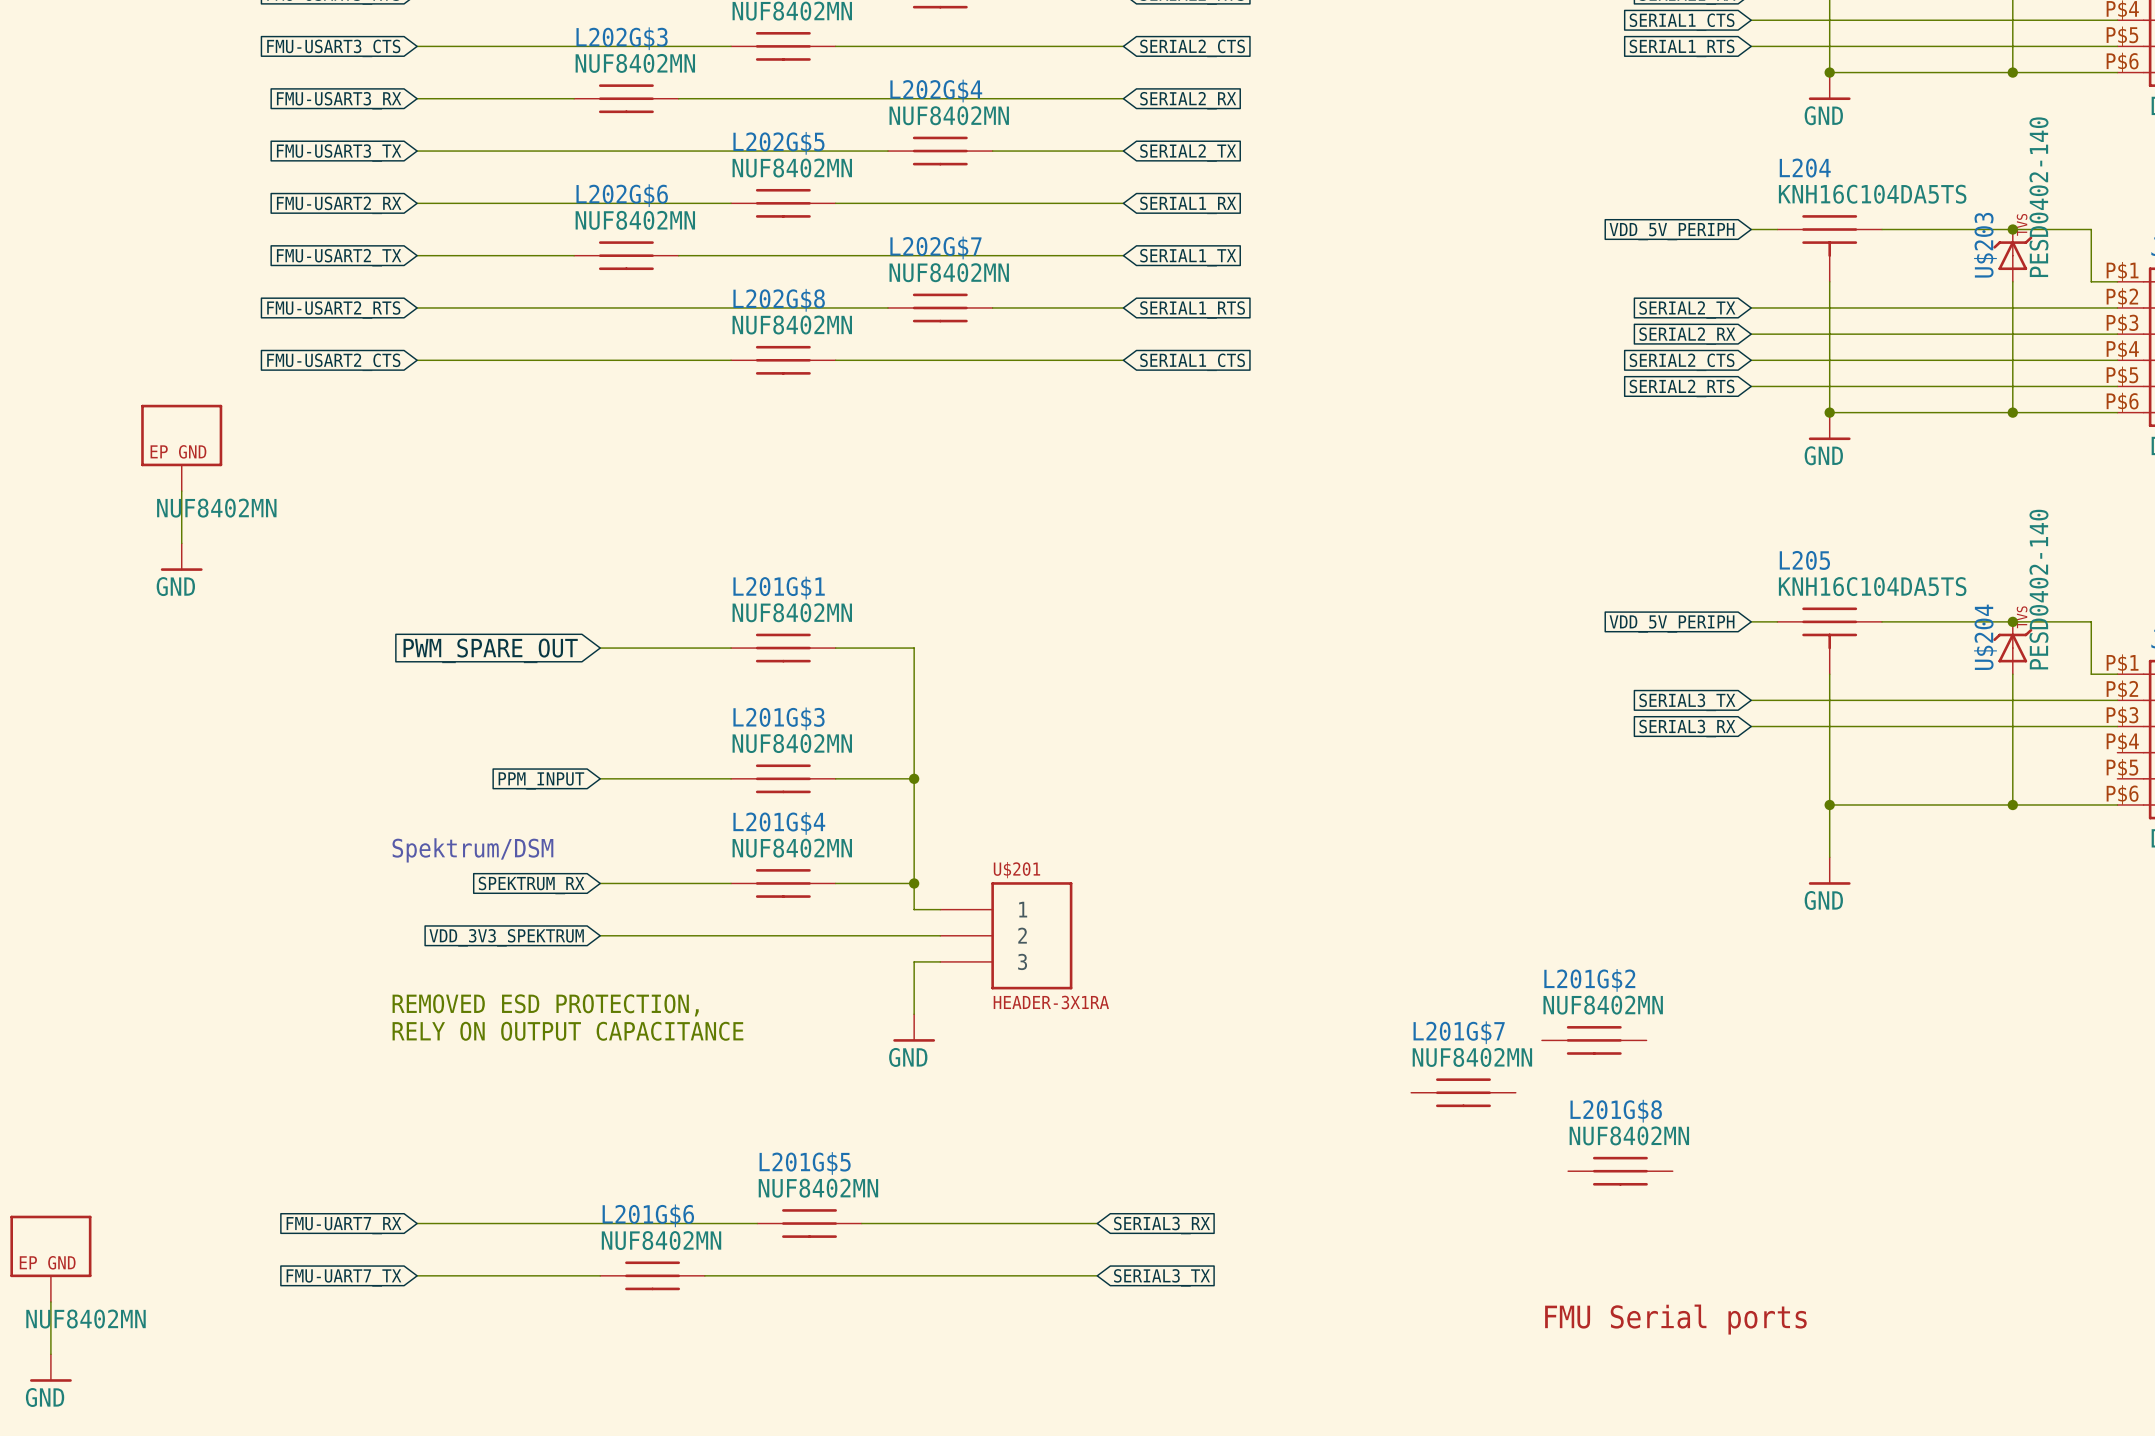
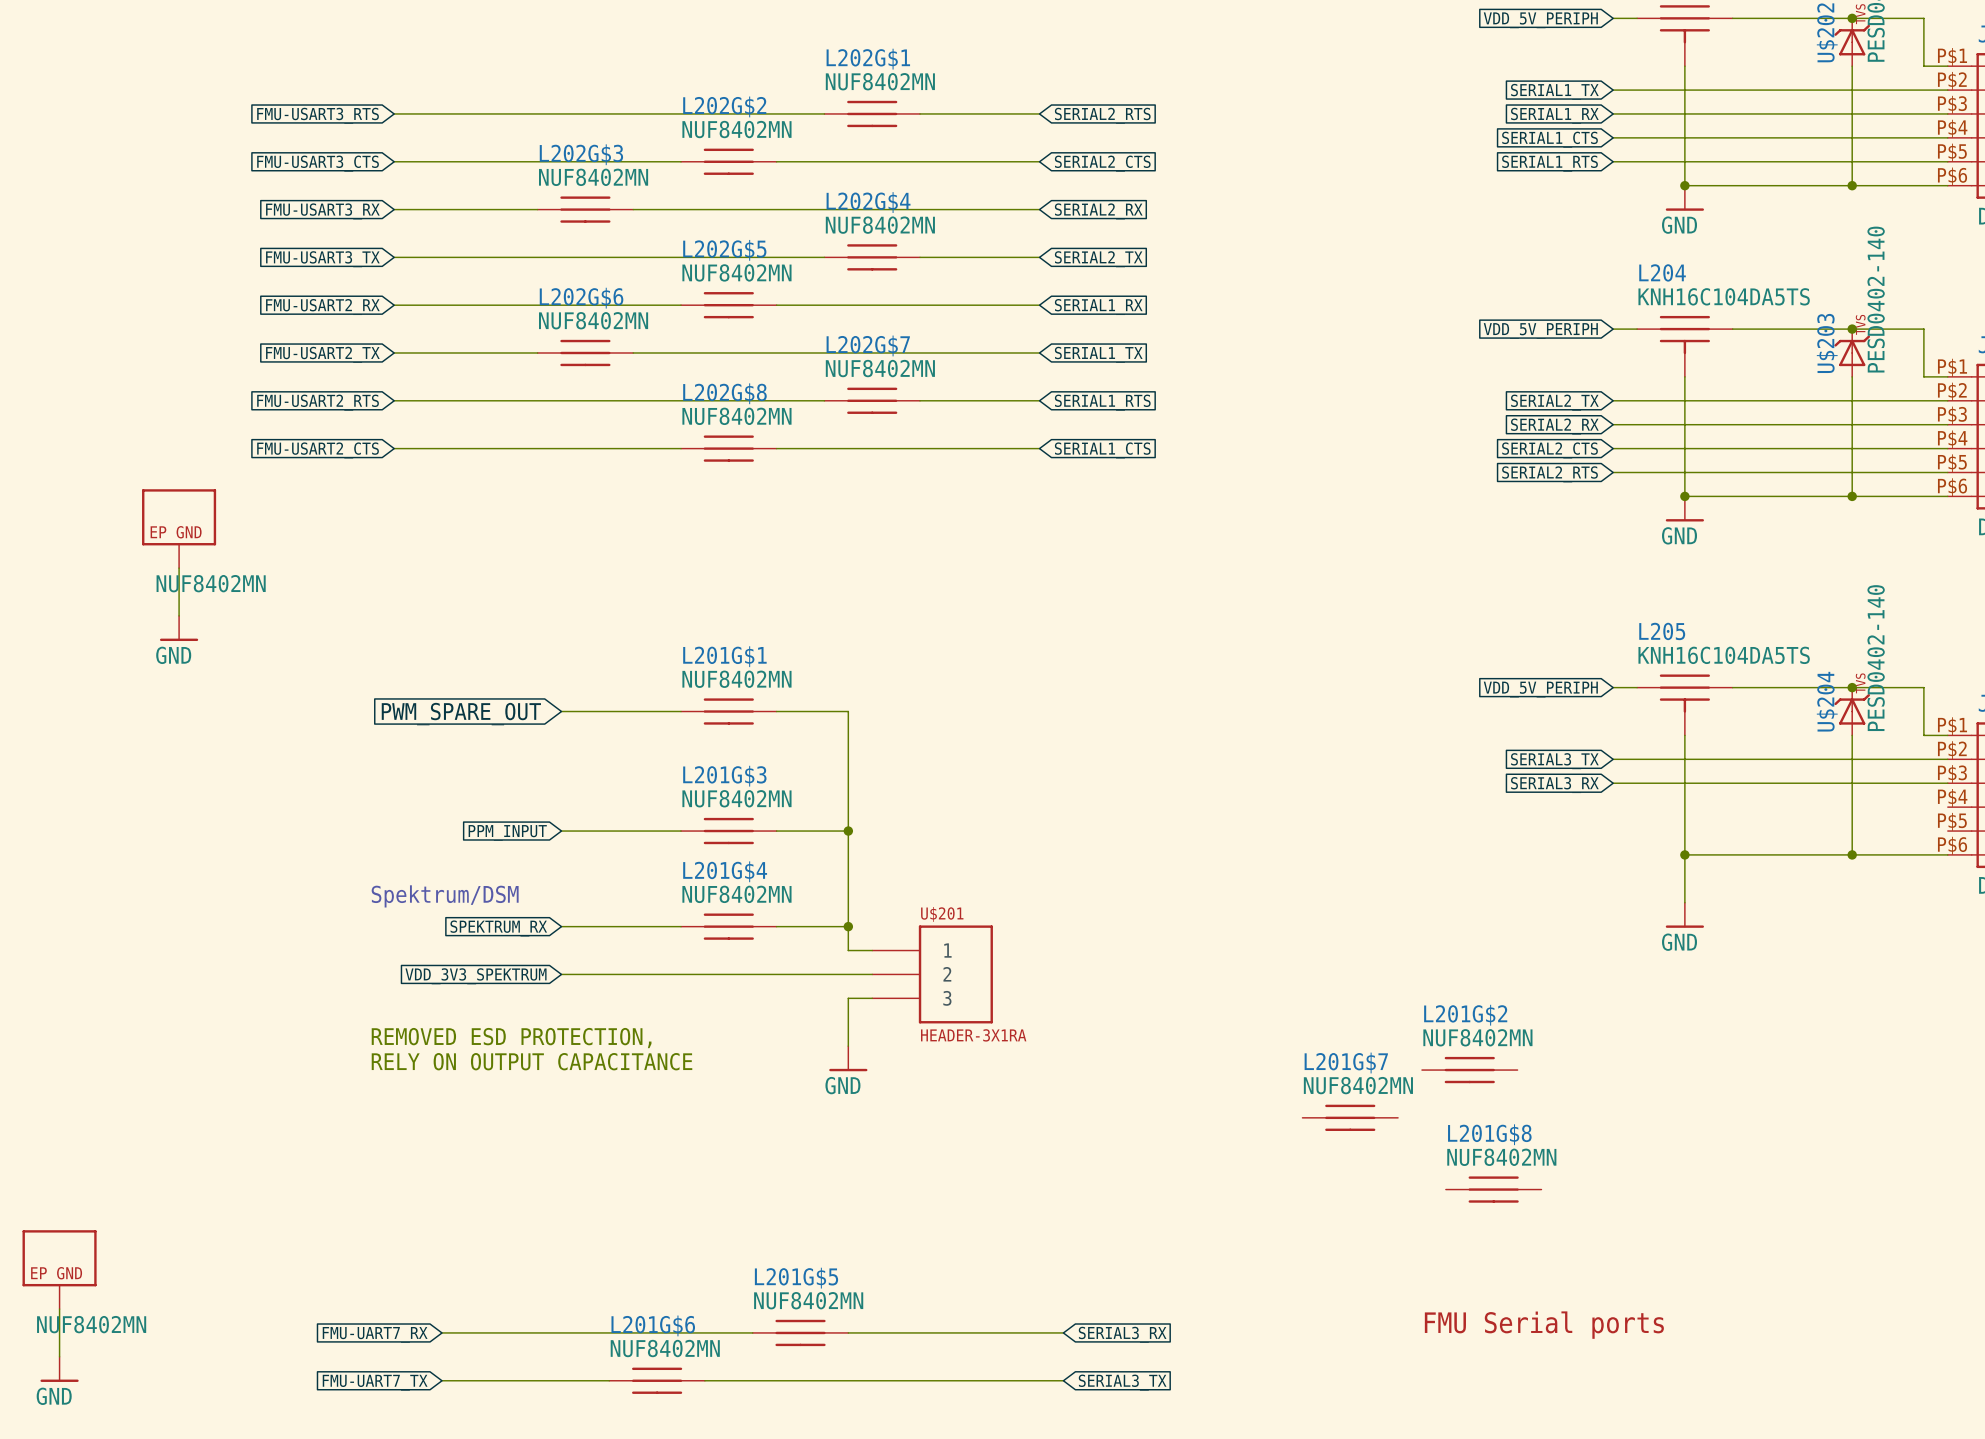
wire: (417, 1223) (757, 1223) -> (441, 1332) (752, 1332)
L201G$5 position: (809, 1223) -> (800, 1332)
wire: (861, 1223) (1097, 1223) -> (848, 1332) (1063, 1332)
global label position: FMU-UART7_RX (343, 1225) -> FMU-UART7_RX (375, 1334)
global label position: SERIAL3_RX (1162, 1225) -> SERIAL3_RX (1122, 1334)
wire: (417, 1275) (600, 1275) -> (441, 1380) (609, 1380)
L201G$6 position: (652, 1275) -> (657, 1380)
wire: (704, 1275) (1097, 1275) -> (704, 1380) (1063, 1380)
global label position: FMU-UART7_TX (343, 1277) -> FMU-UART7_TX (375, 1382)
global label position: SERIAL3_TX (1162, 1277) -> SERIAL3_TX (1122, 1382)

